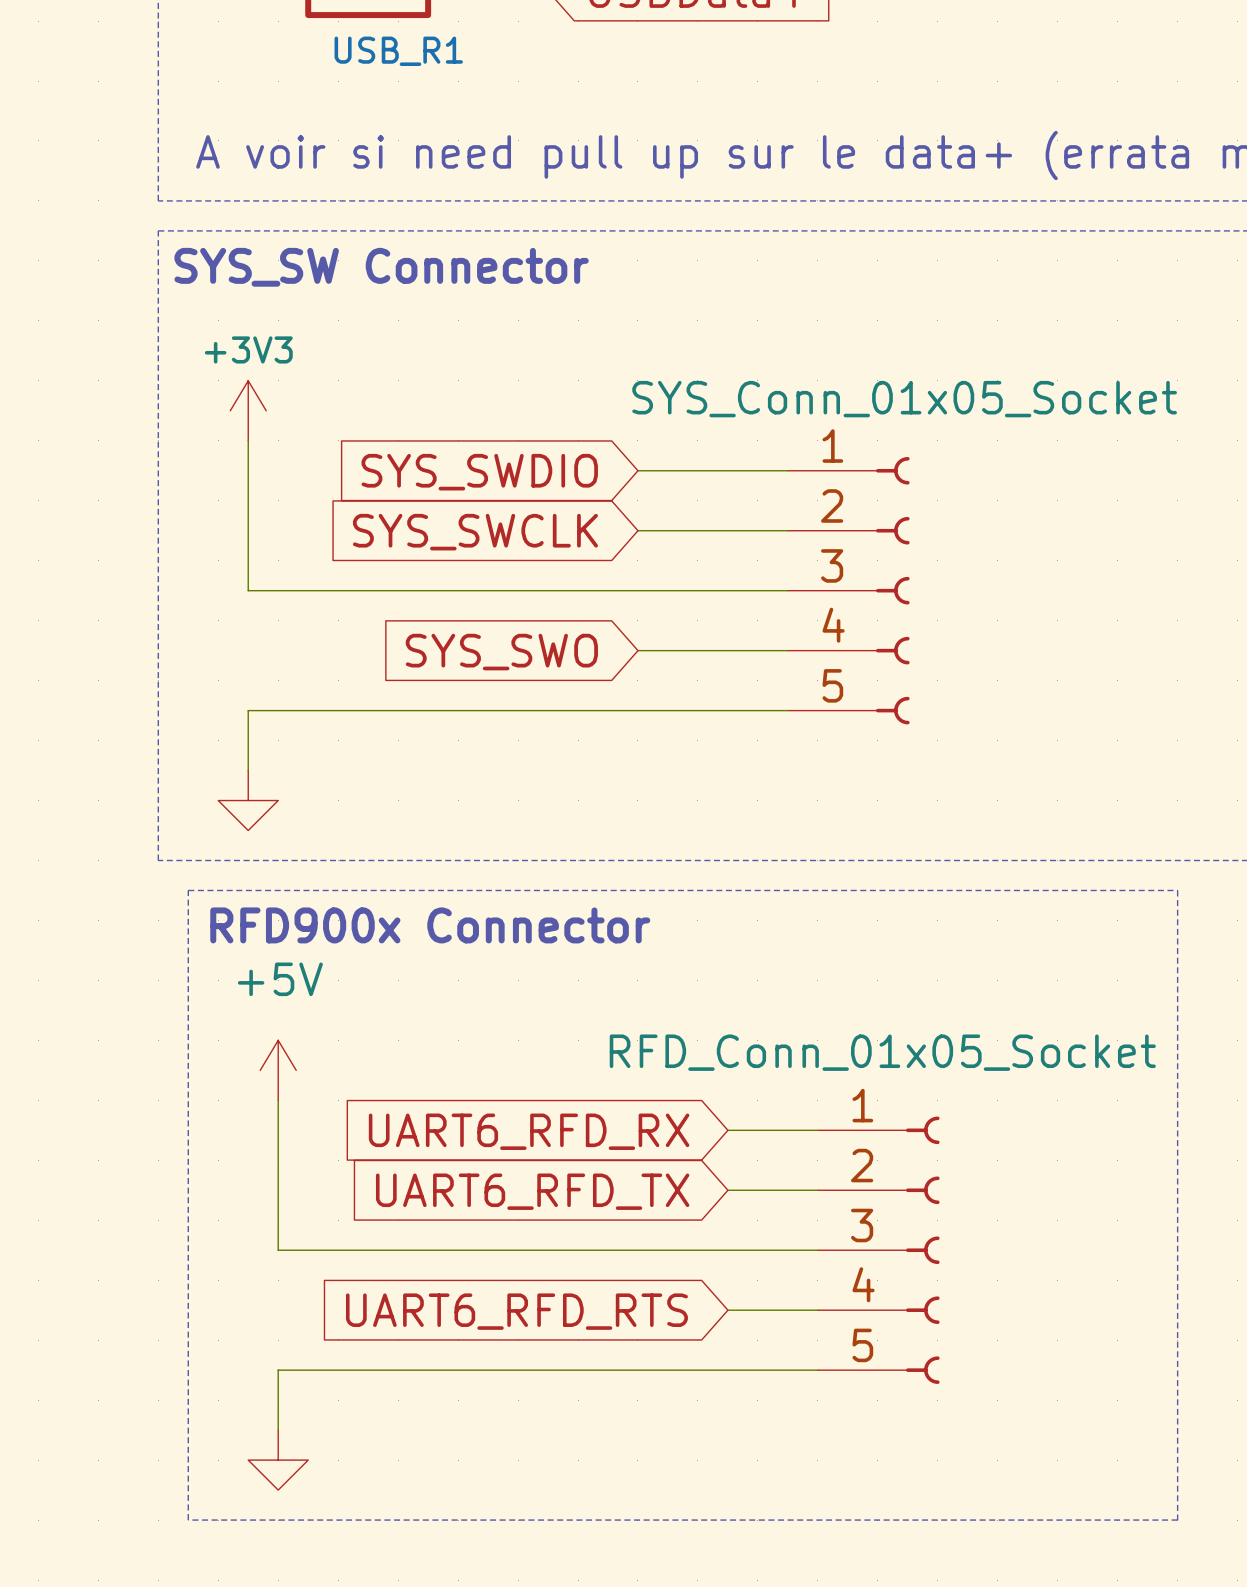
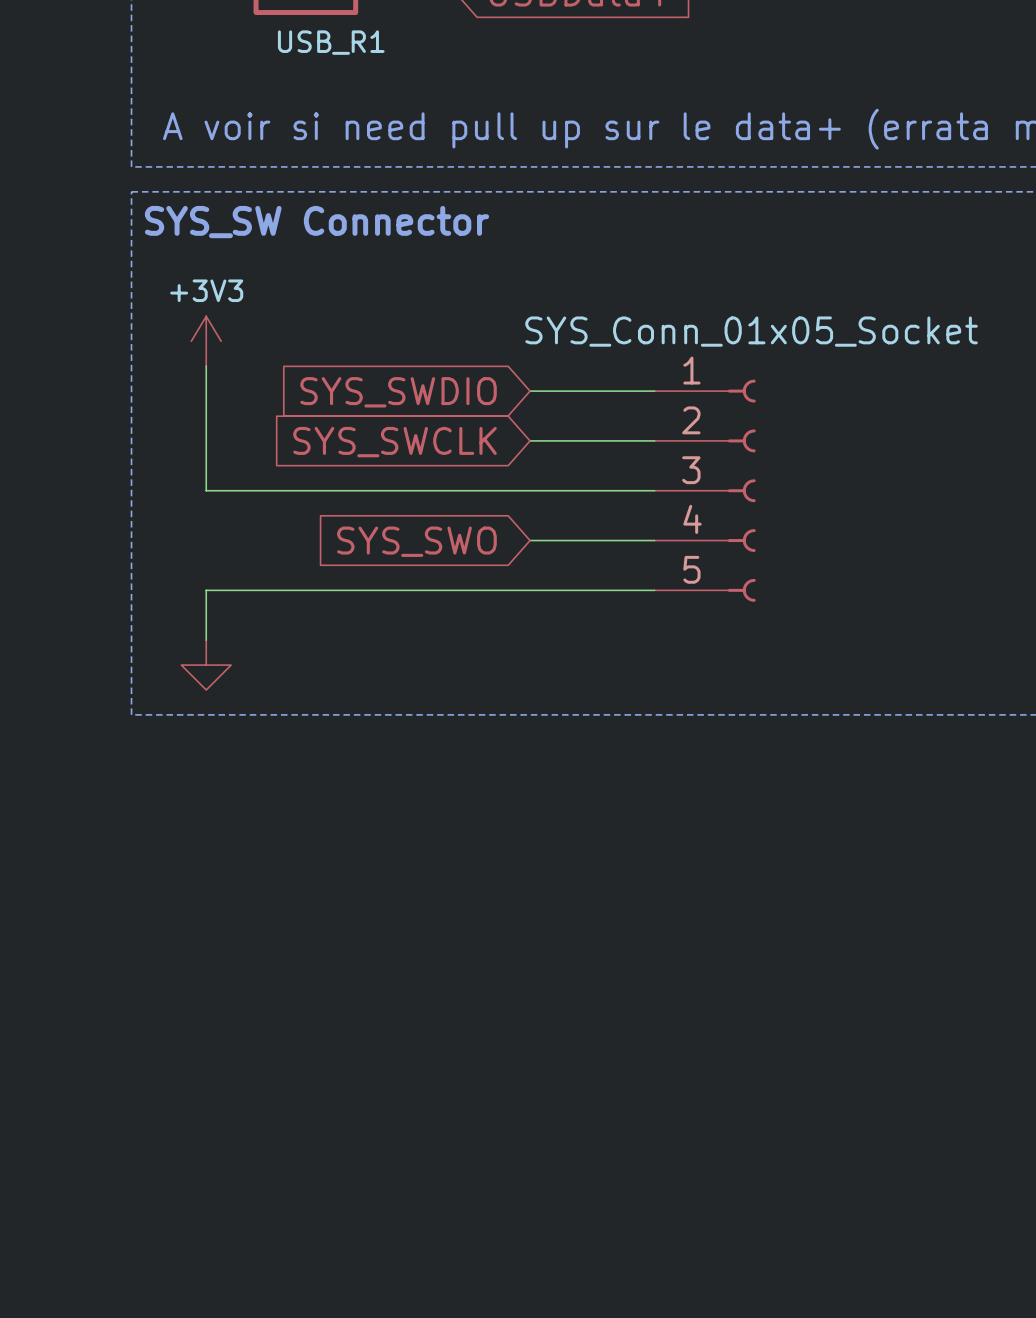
line: (188, 890) (1177, 890) (1177, 1520) (188, 1520) (188, 890) -> none
text: RFD900x Connector (430, 925) -> none
power symbol: +5V (278, 1070) -> none
wire: (278, 1100) (278, 1250) (817, 1250) -> none
wire: (727, 1130) (817, 1130) -> none
global label: UART6_RFD_RX (529, 1131) -> none
wire: (727, 1190) (817, 1190) -> none
global label: UART6_RFD_TX (532, 1191) -> none
part: RFD_Conn_01x05_Socket (878, 1250) -> none
wire: (727, 1310) (817, 1310) -> none
global label: UART6_RFD_RTS (516, 1311) -> none
wire: (817, 1370) (278, 1370) (278, 1430) -> none
power symbol: (278, 1460) -> none

